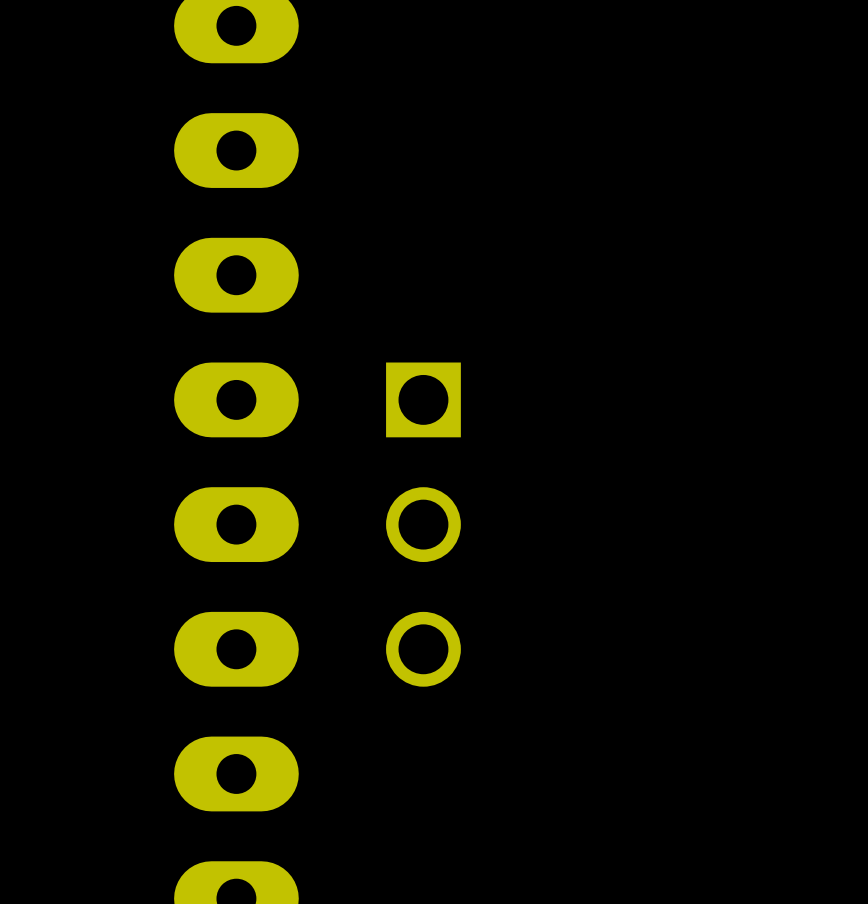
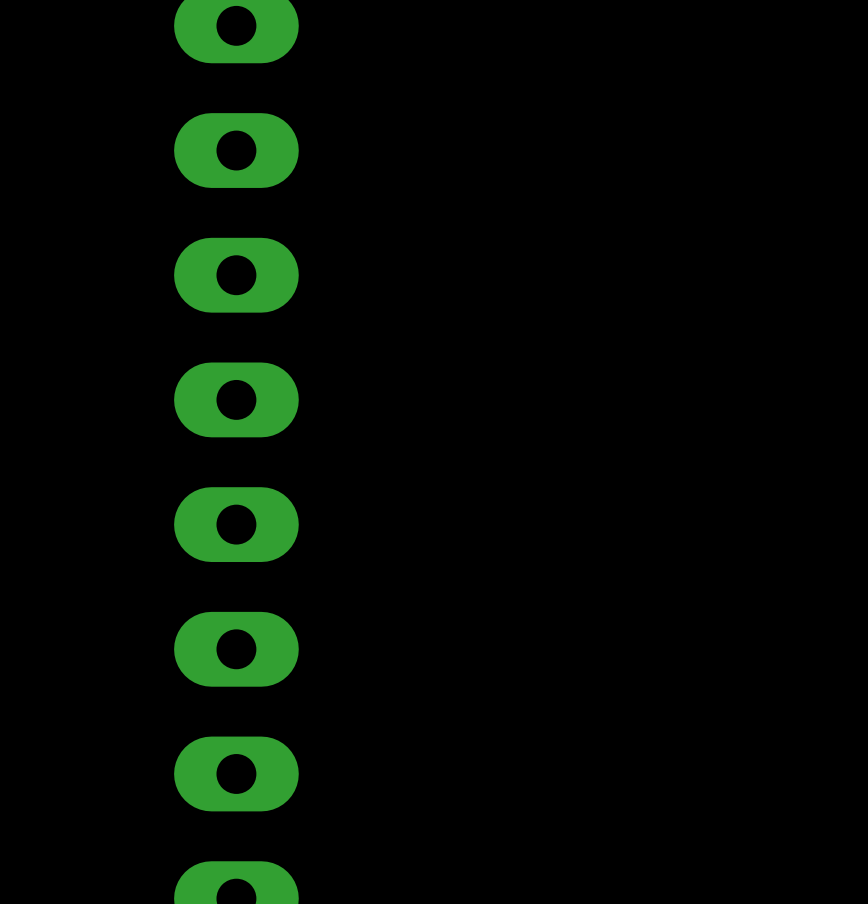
part: (423, 524) -> none

